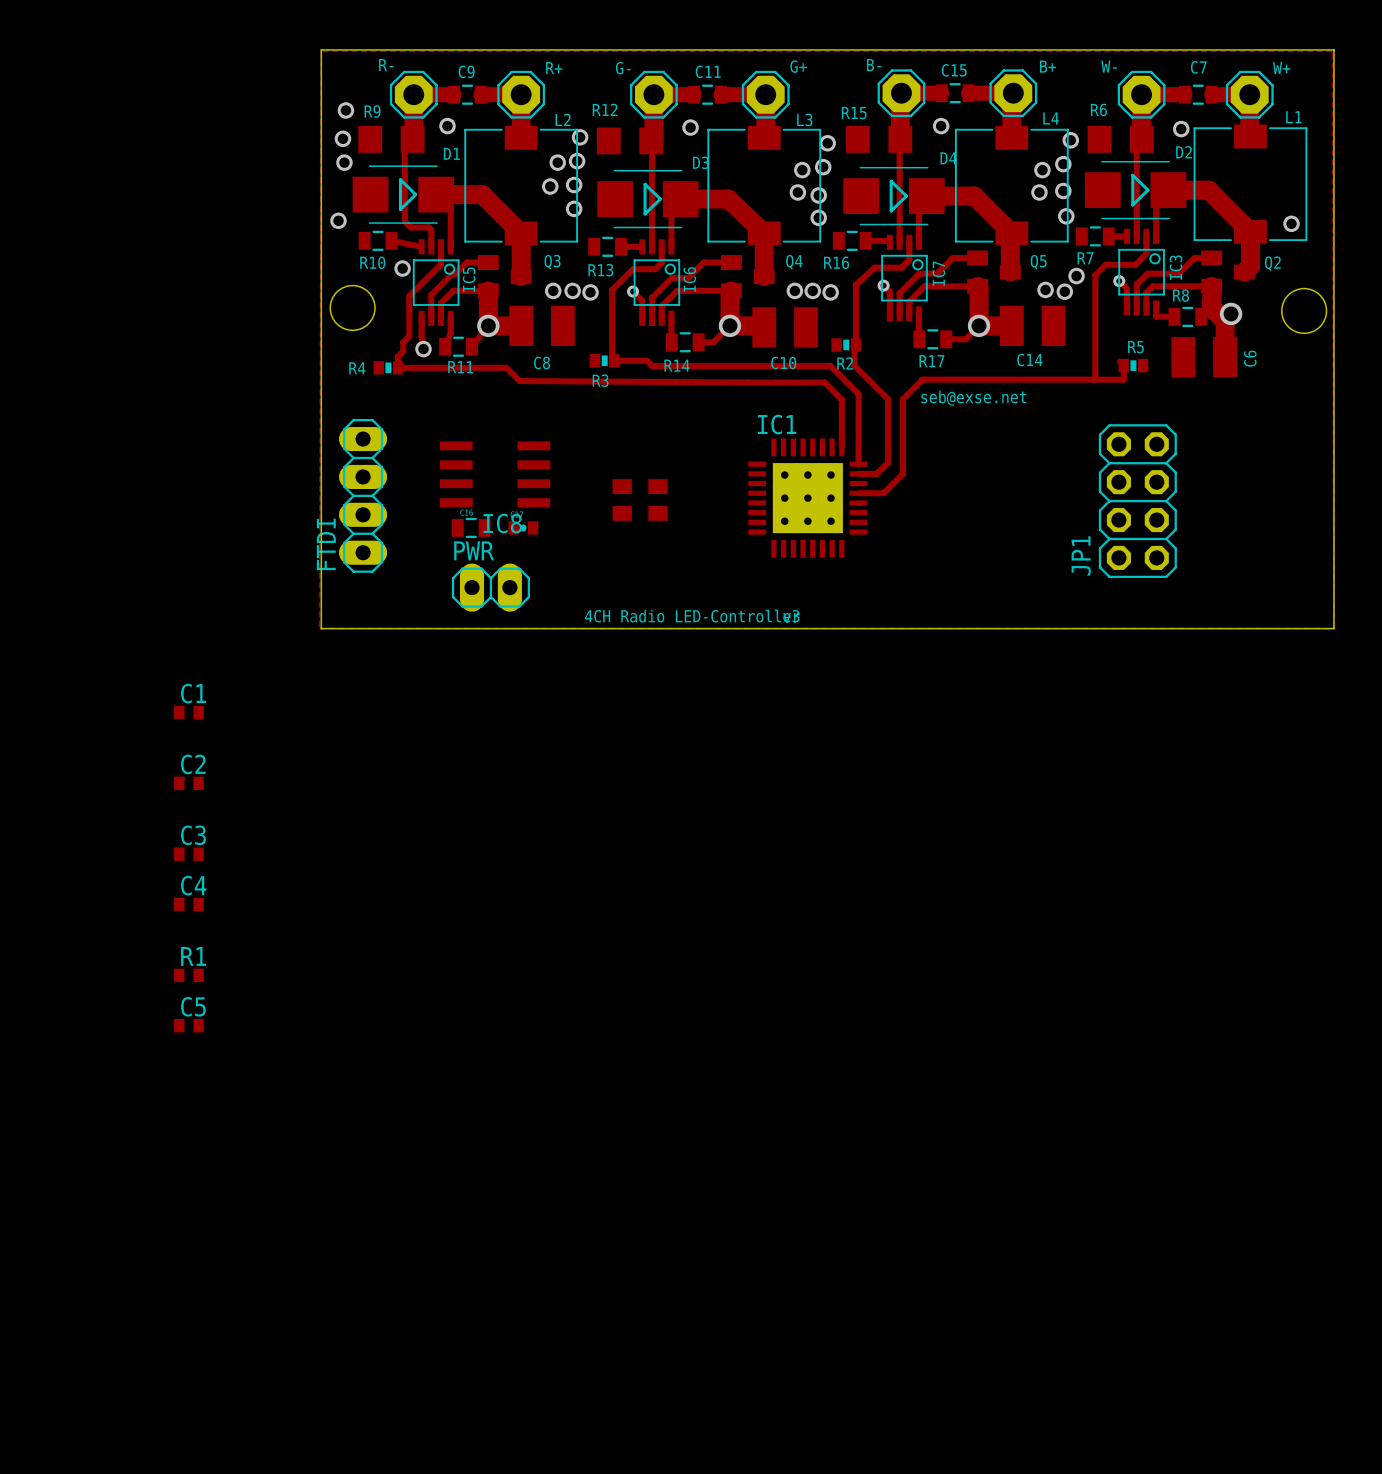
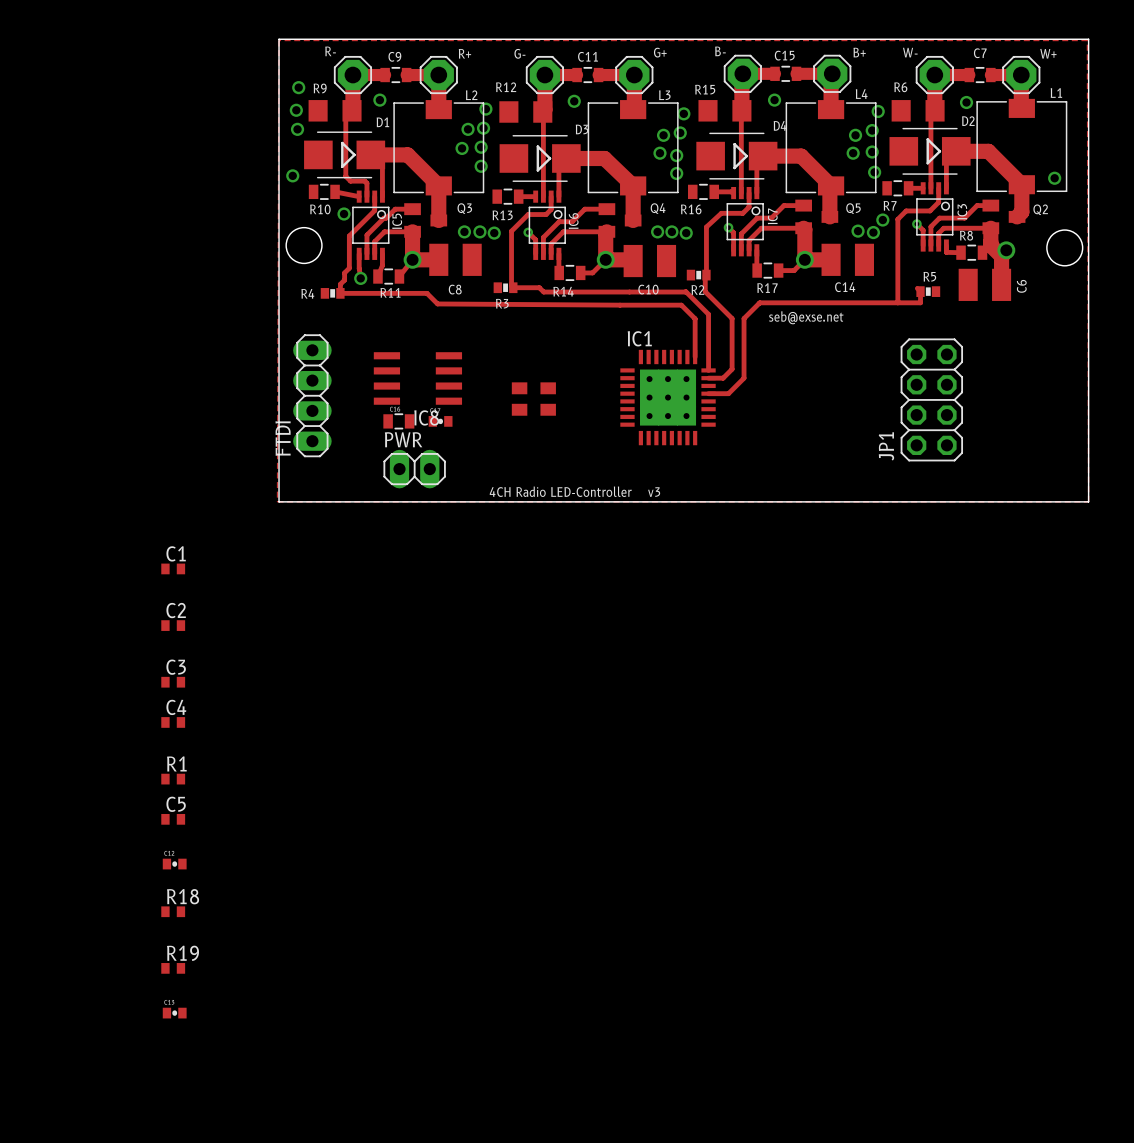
part: none -> (174, 864)
R18: none -> (173, 911)
R19: none -> (173, 968)
part: none -> (174, 1013)

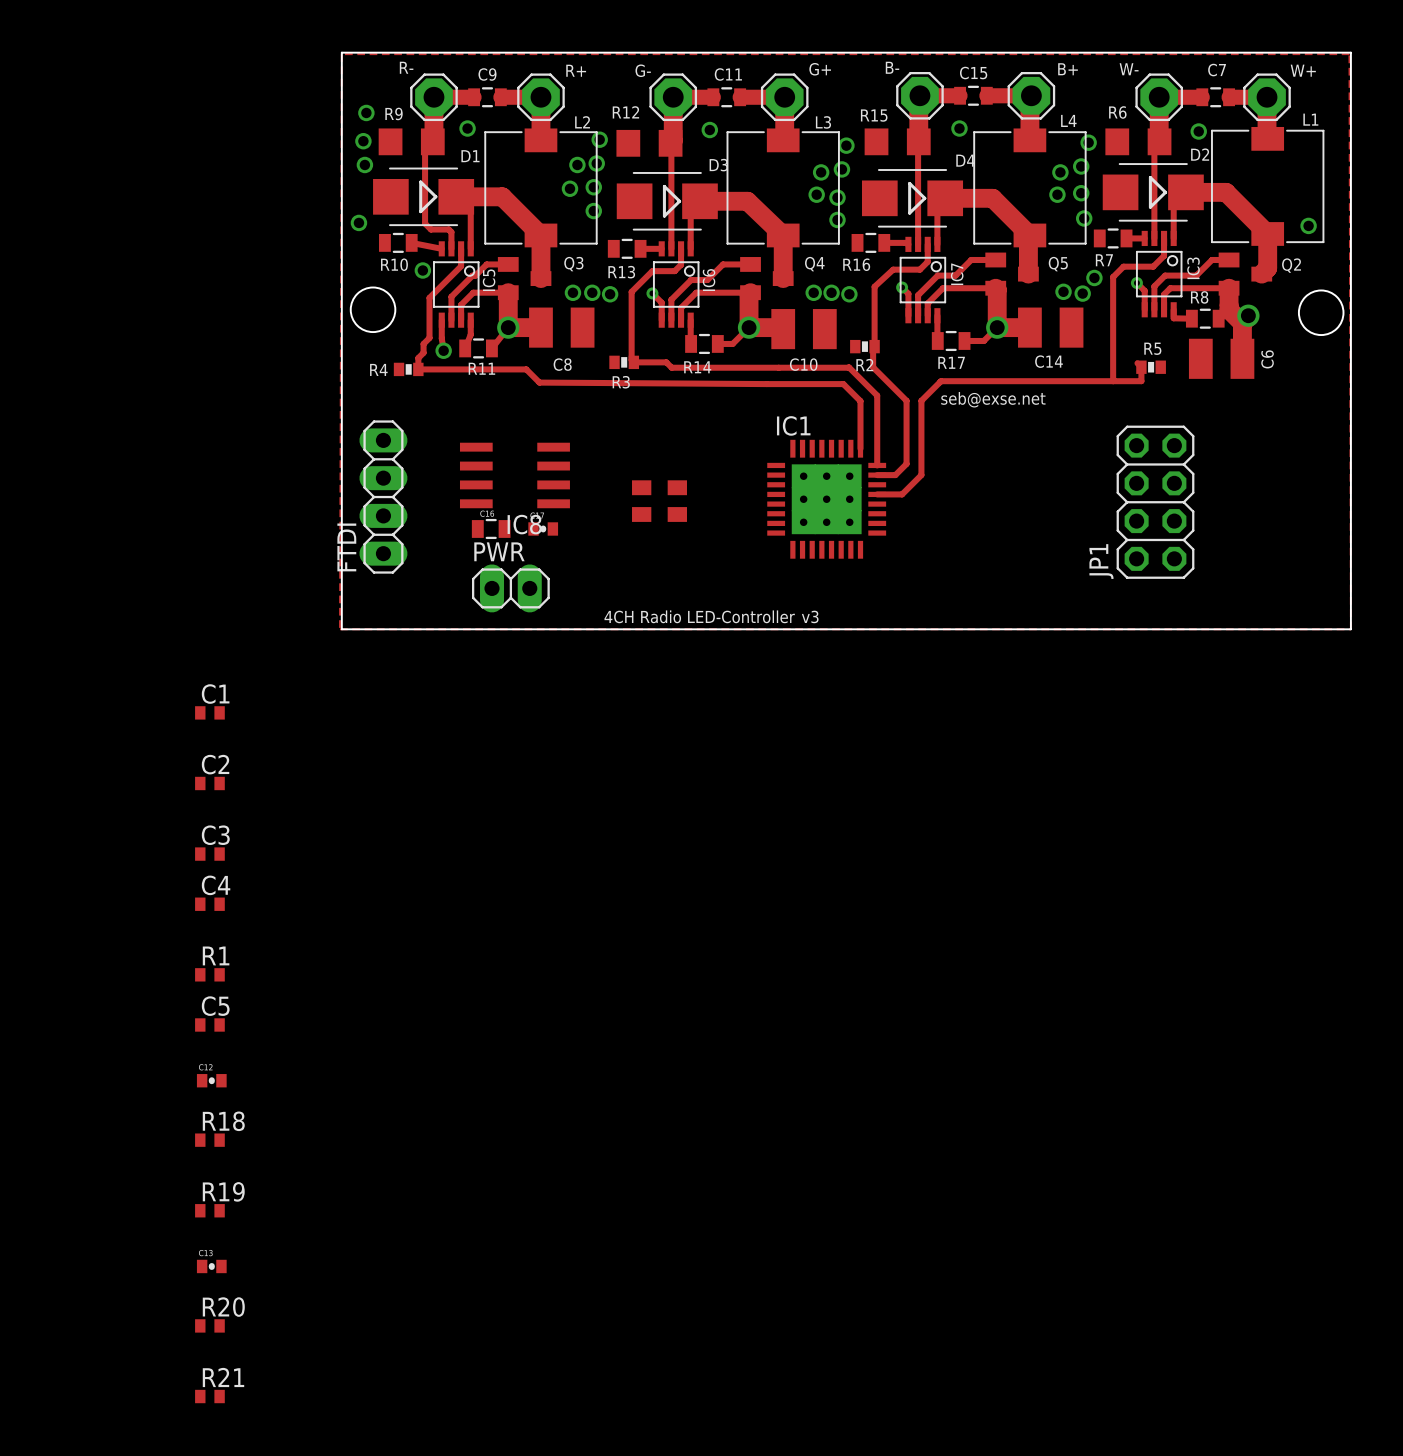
R20: none -> (209, 1325)
R21: none -> (209, 1396)

